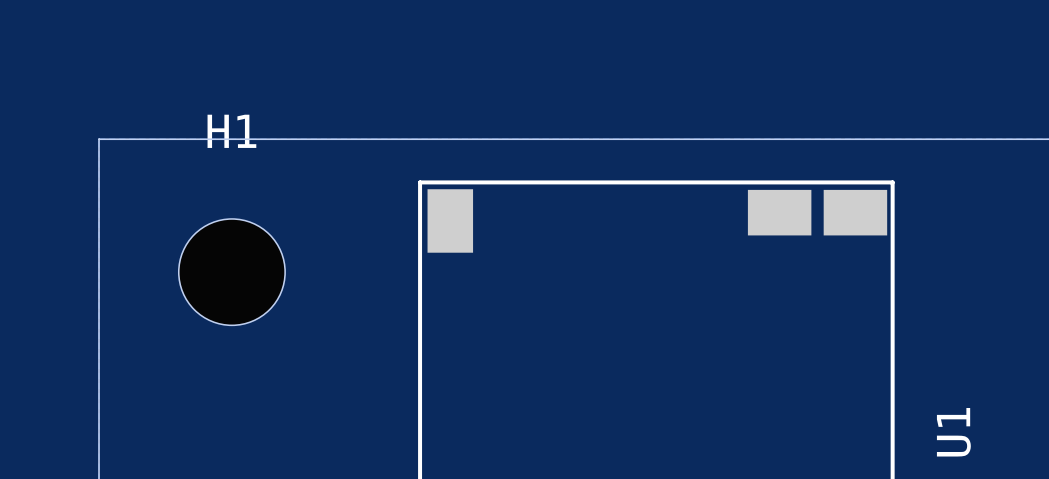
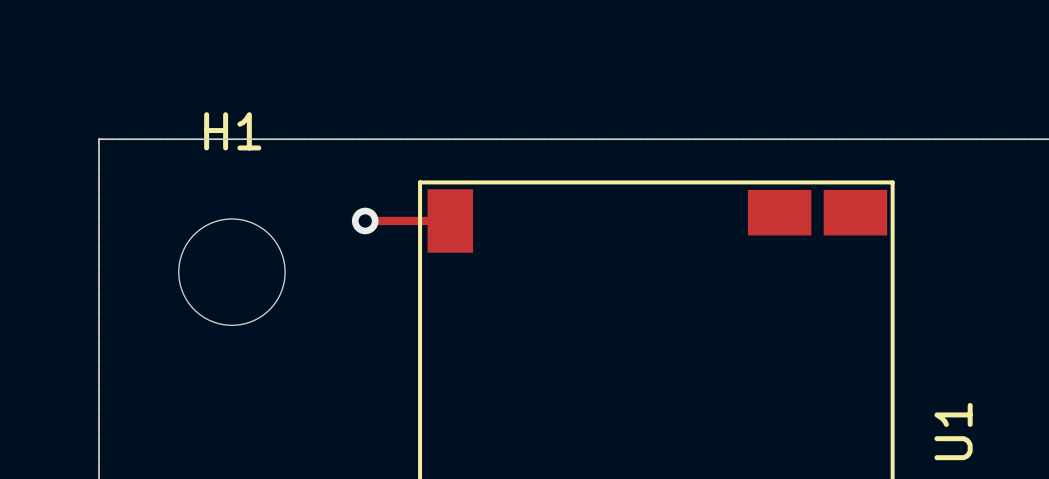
track: none -> (365, 220) (450, 220)
via: none -> (365, 220)

